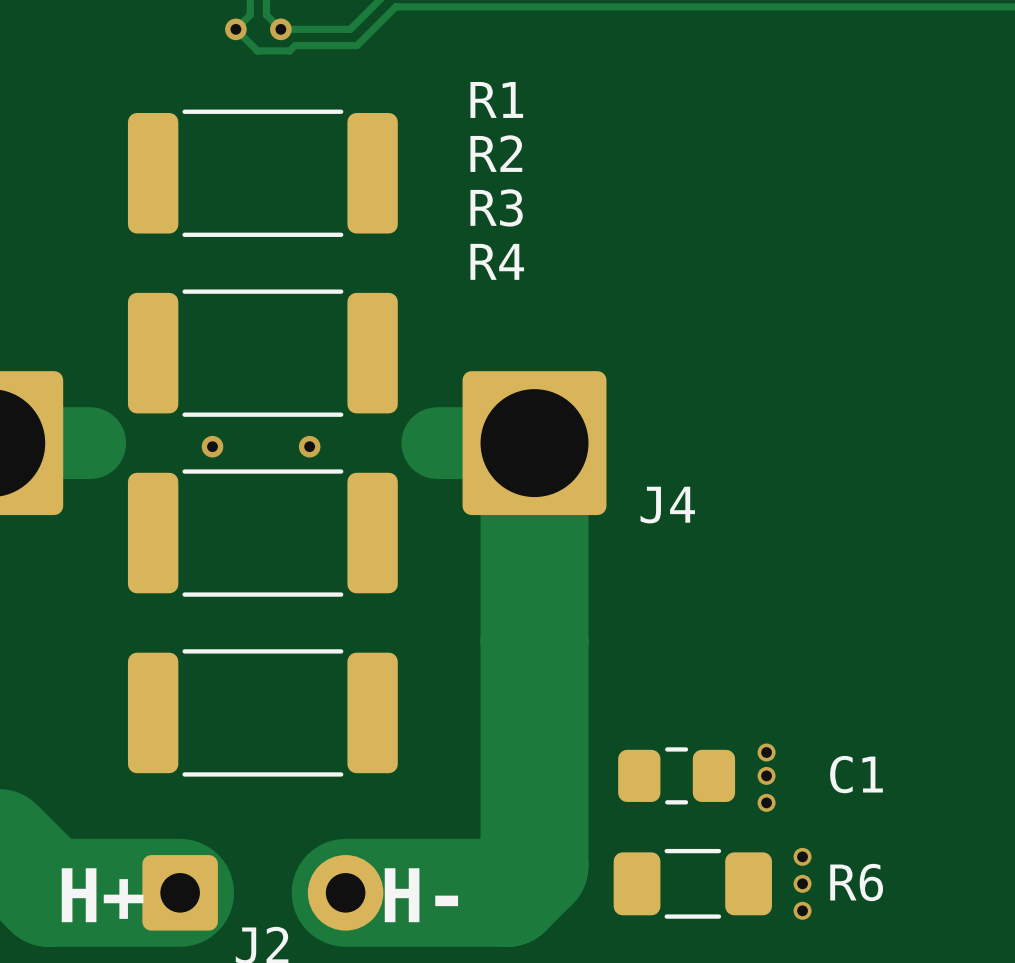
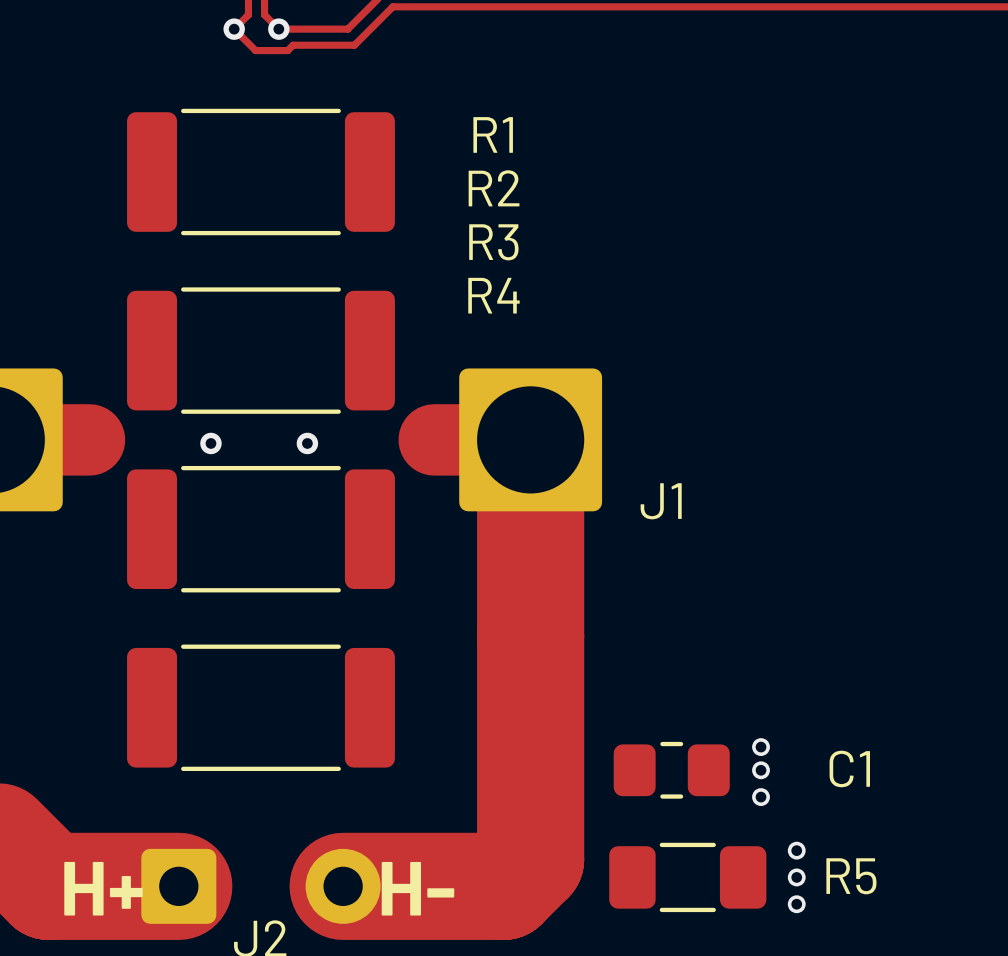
R1 name position: R1 (496, 99) -> R1 (493, 134)
R2 name position: R2 (496, 153) -> R2 (494, 188)
R3 name position: R3 (496, 207) -> R3 (493, 242)
R4 name position: R4 (497, 261) -> R4 (493, 295)
J4 name: J4 (667, 505) -> J1 (661, 501)
R6 name: R6 (856, 882) -> R5 (851, 876)

